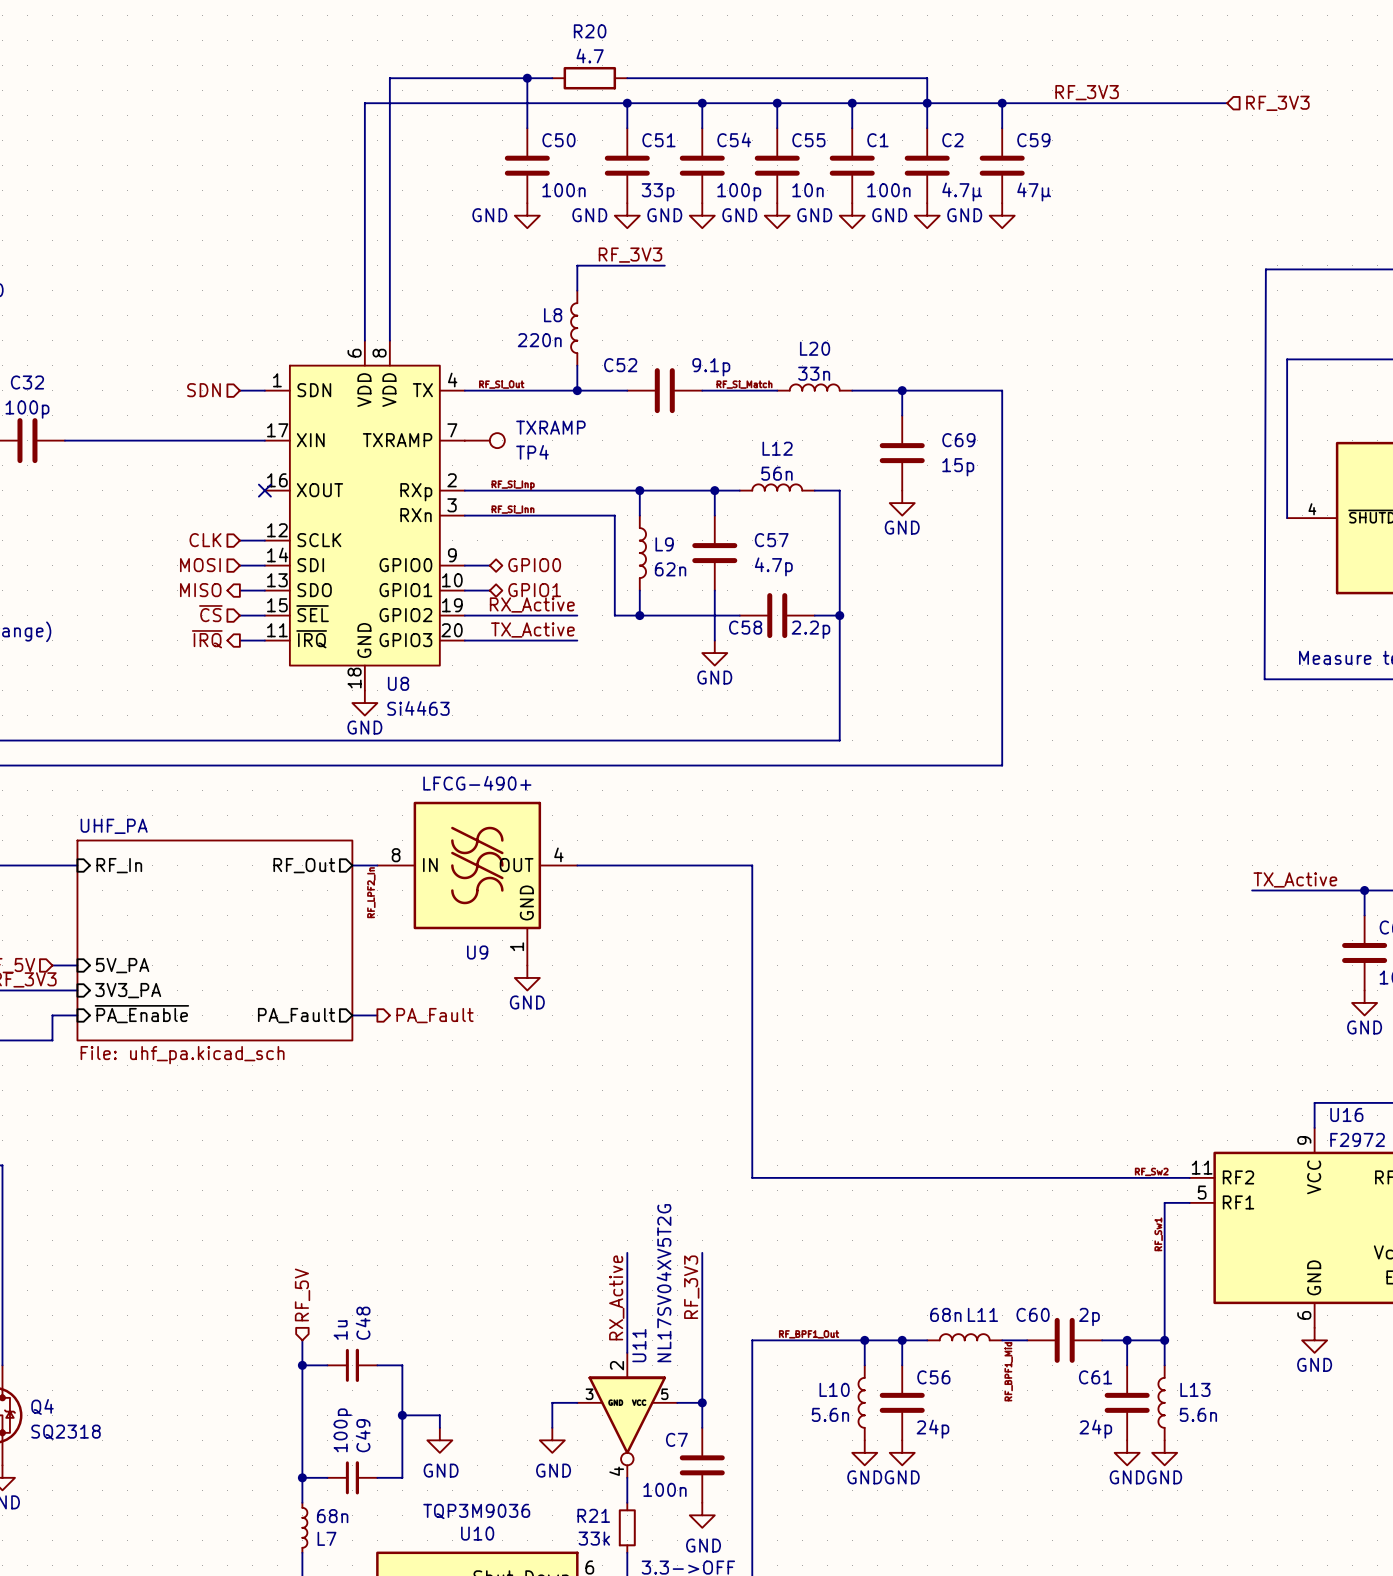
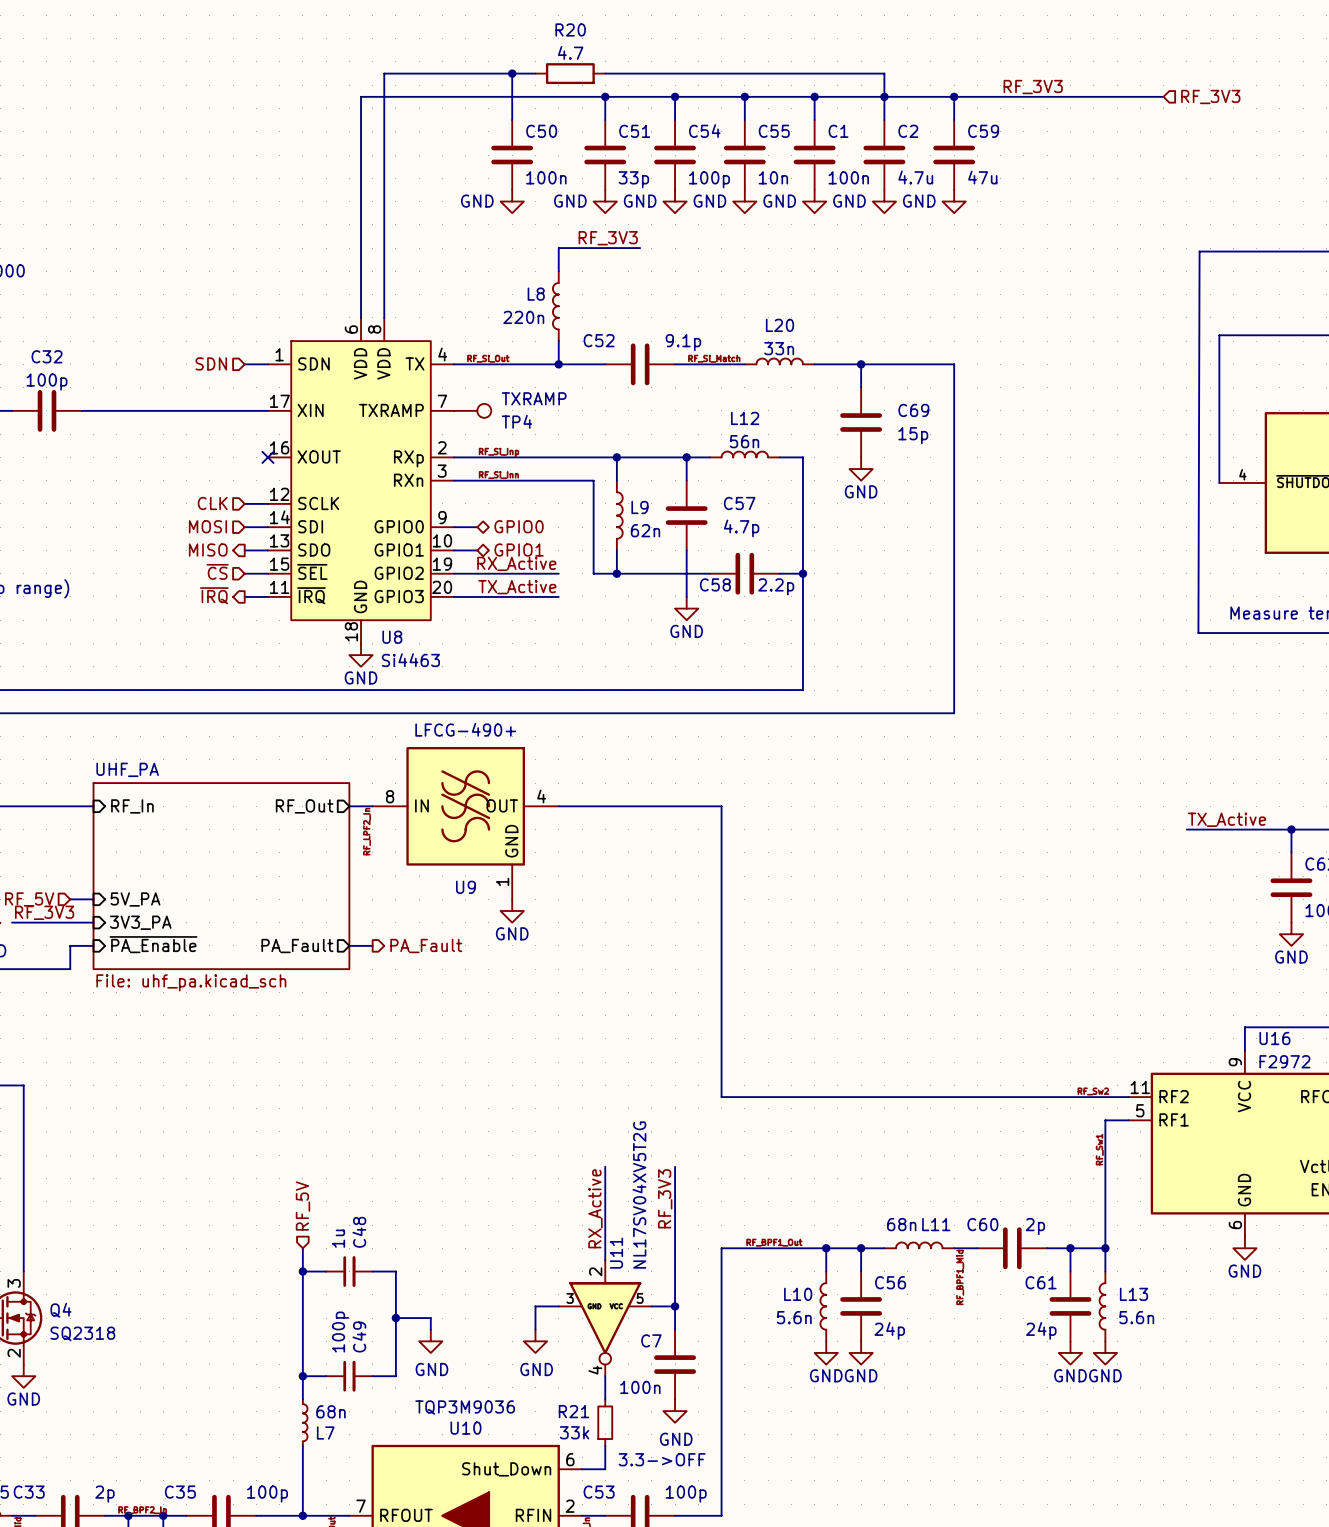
C2 value: 4.7µ (962, 192) -> 4.7u (915, 177)
C59 value: 47µ (1034, 192) -> 47u (982, 177)

